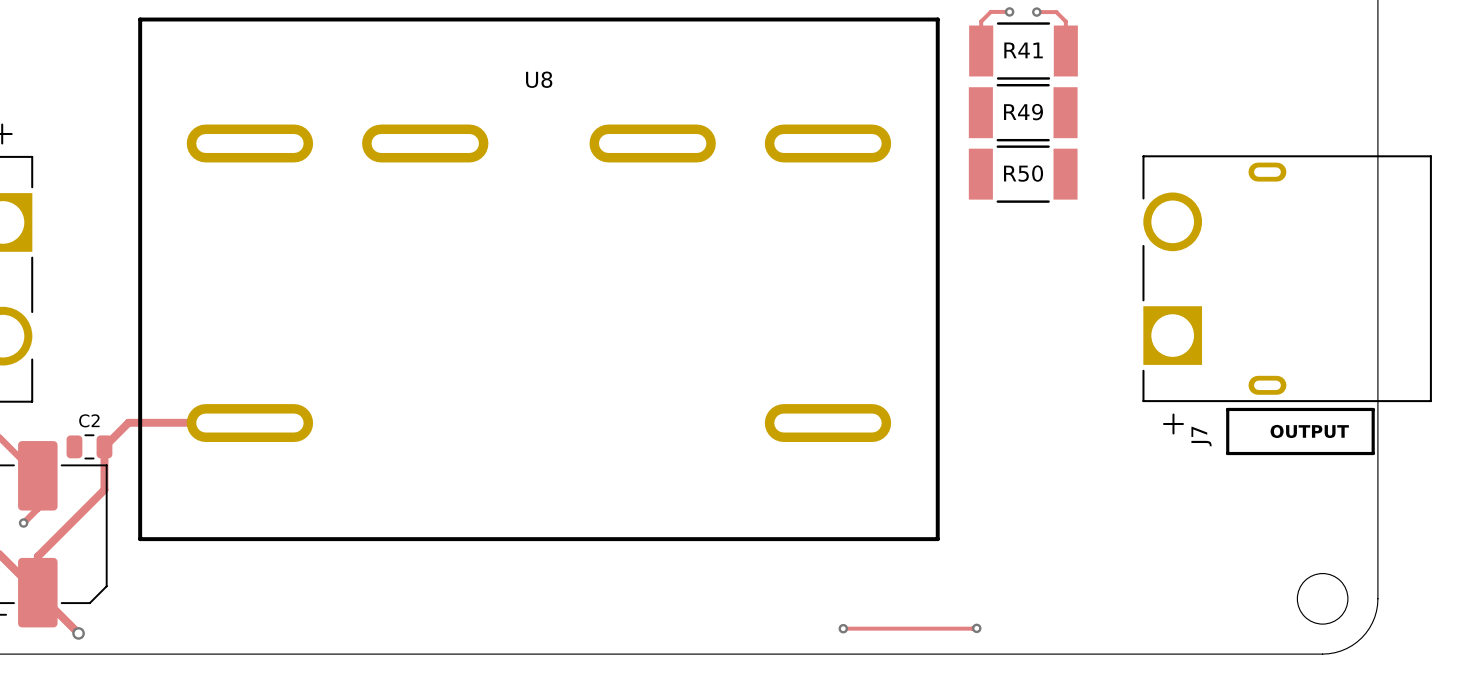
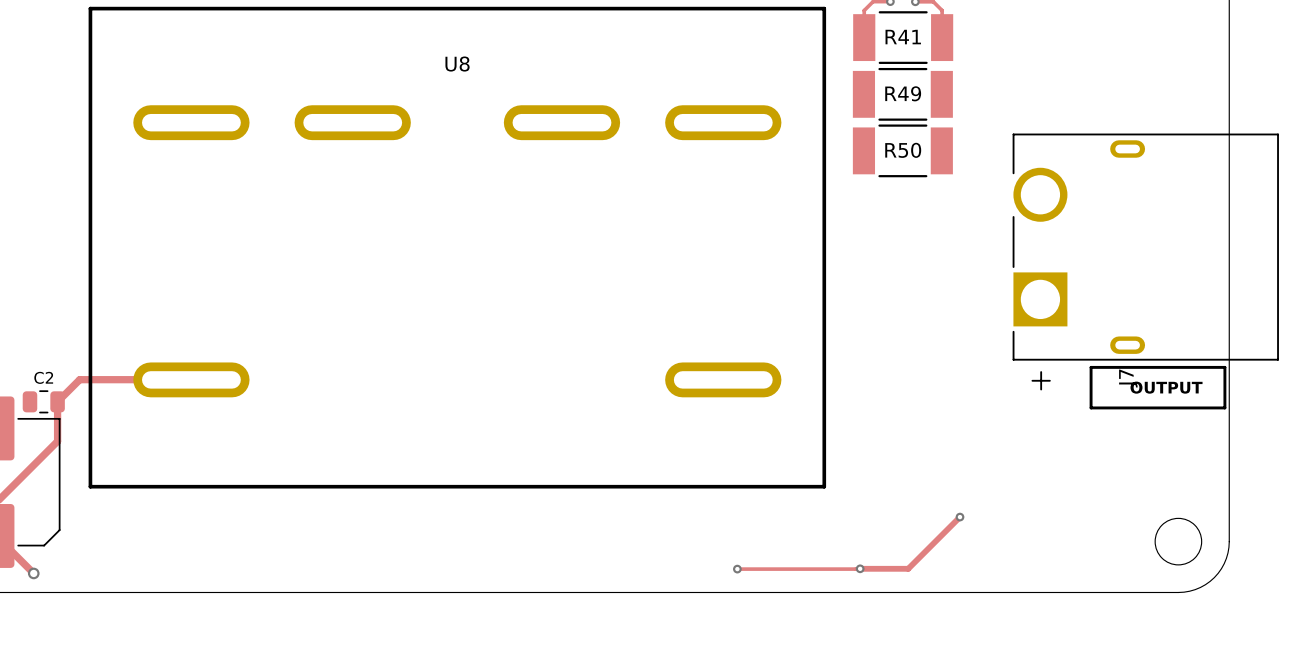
J7 name position: J7 (1201, 436) -> J7 (1128, 378)
track: none -> (960, 517) (908, 568) (859, 569)
via: none -> (960, 517)

